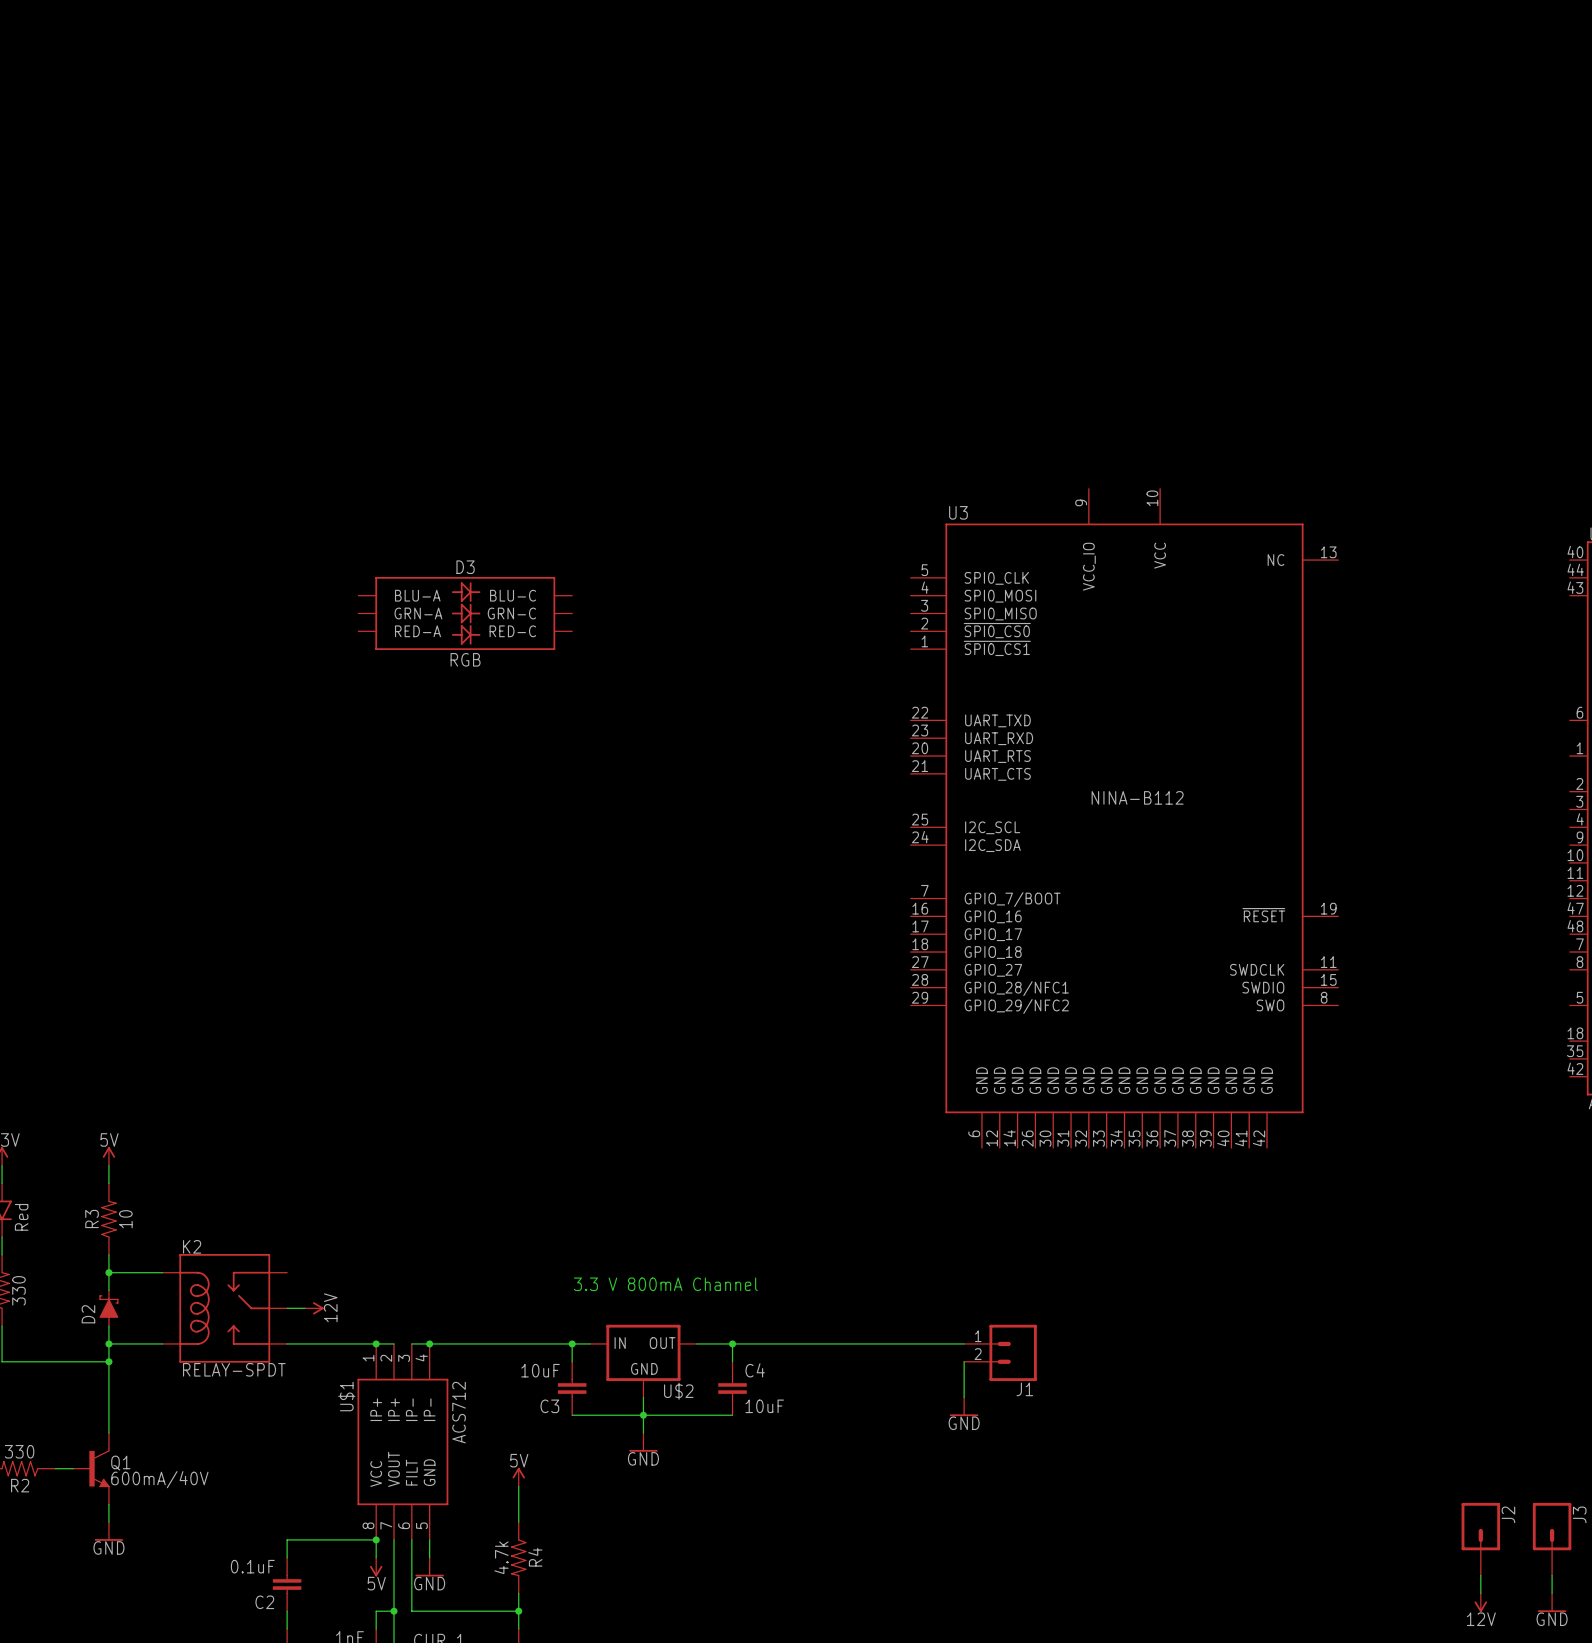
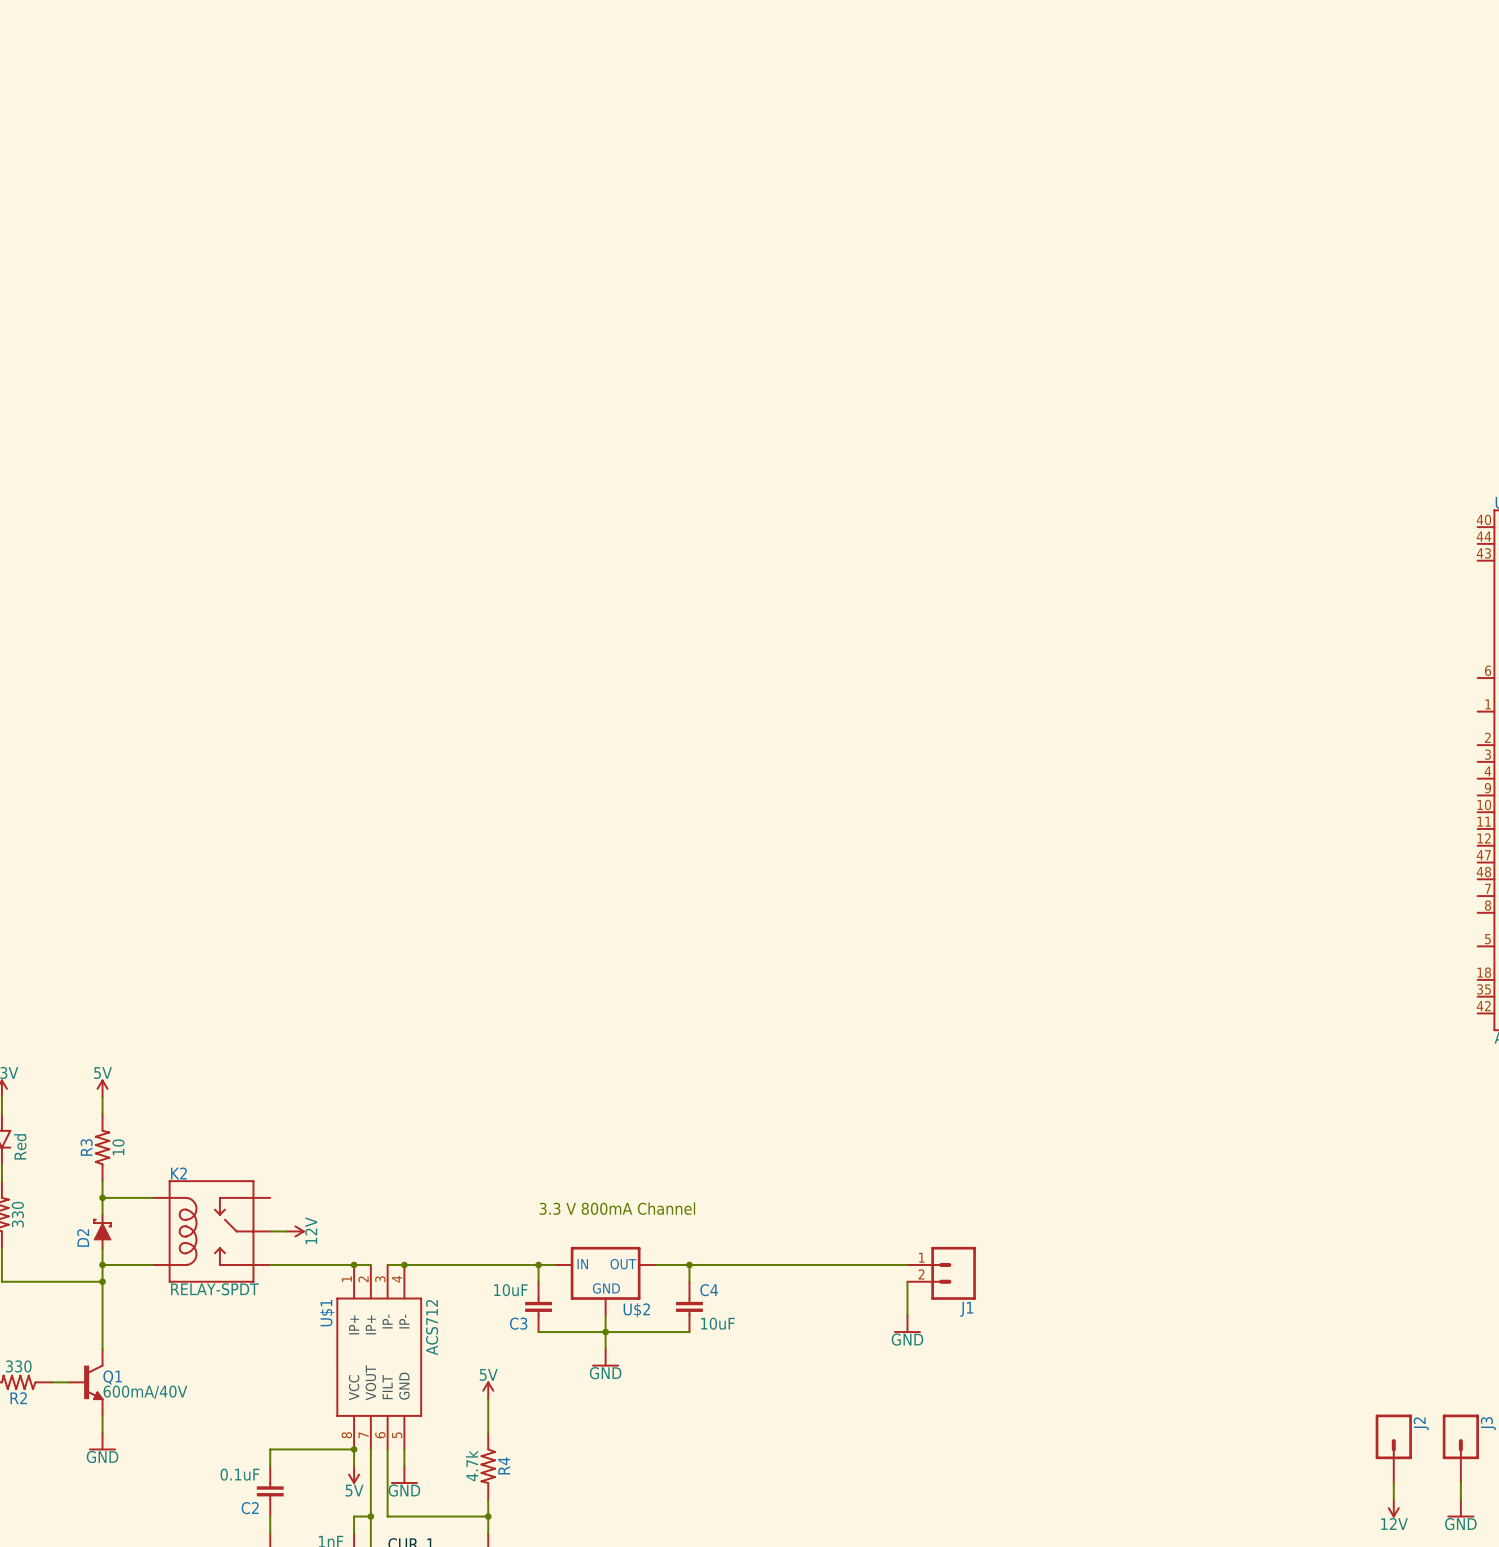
D3: RGB (465, 613) -> none
U3: NINA-B112 (1124, 818) -> none

